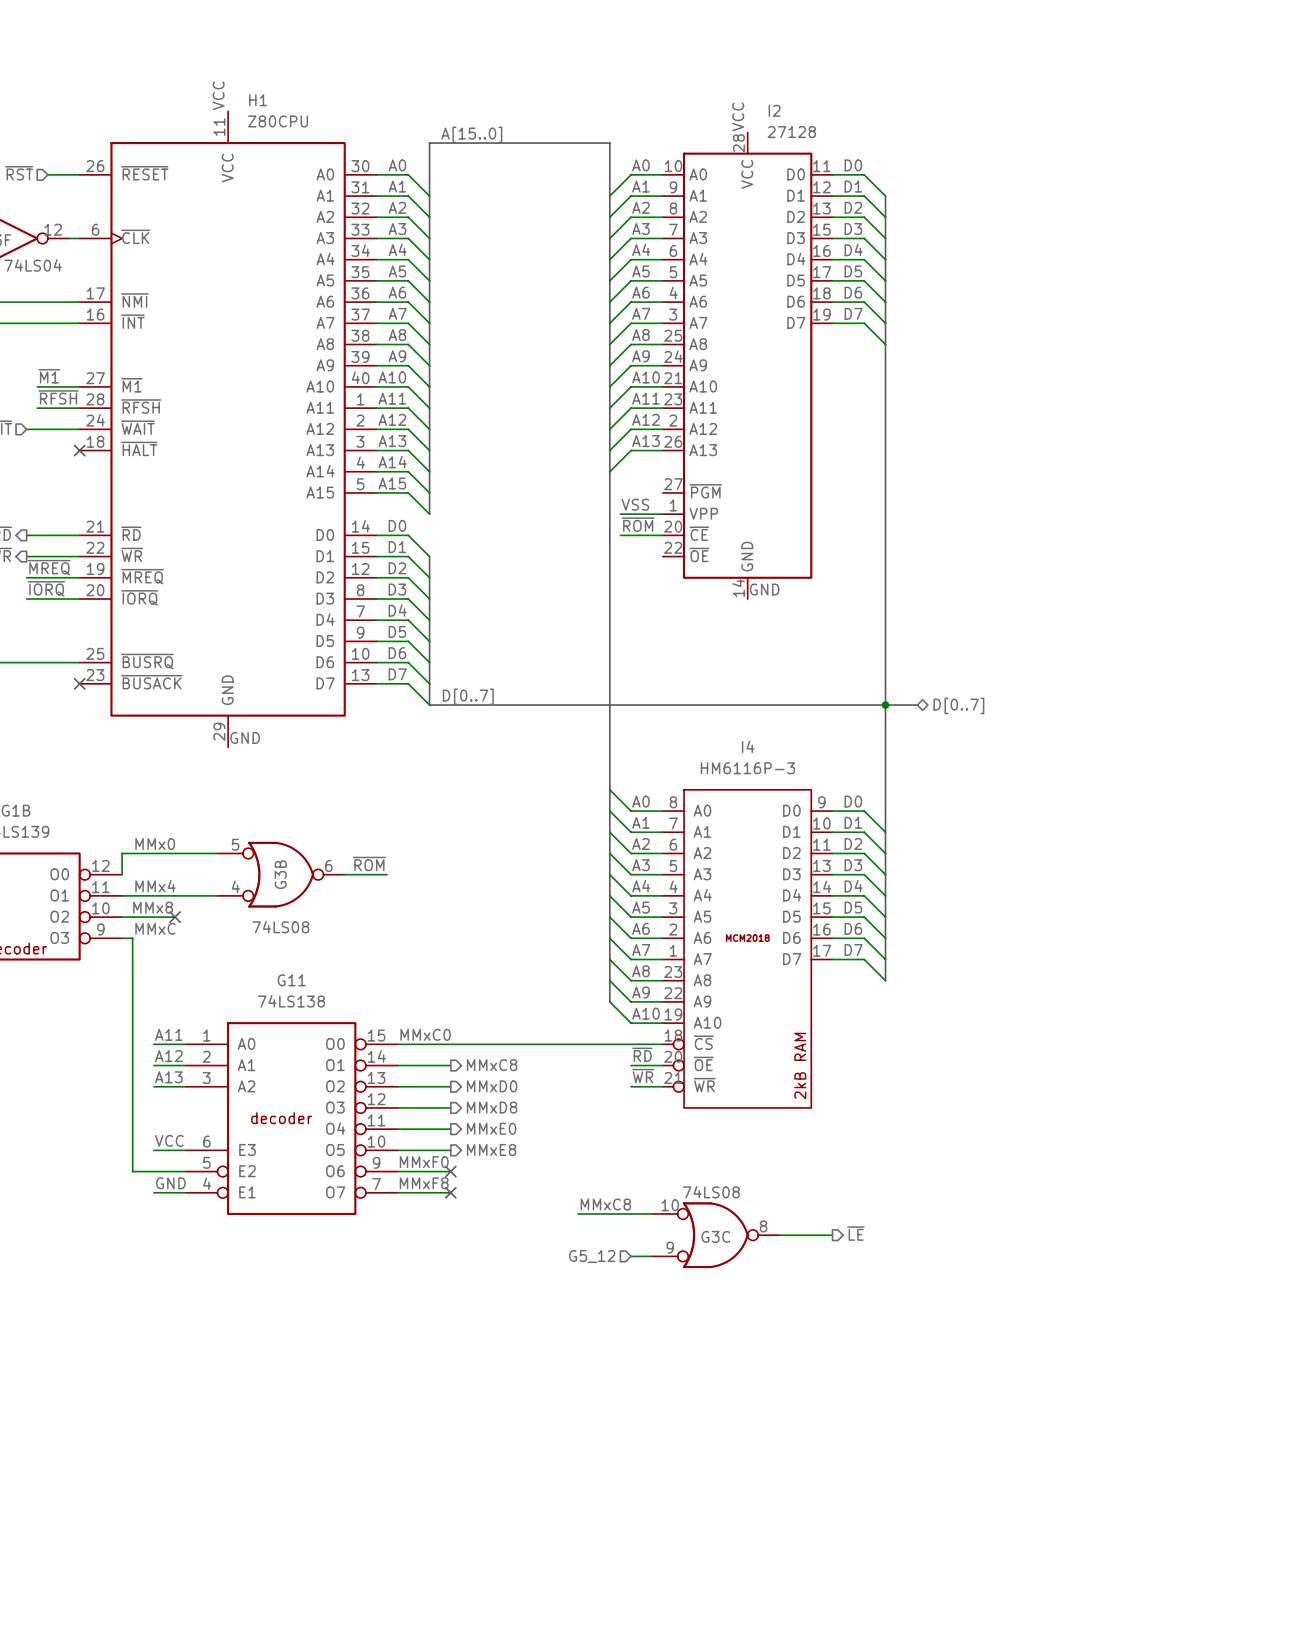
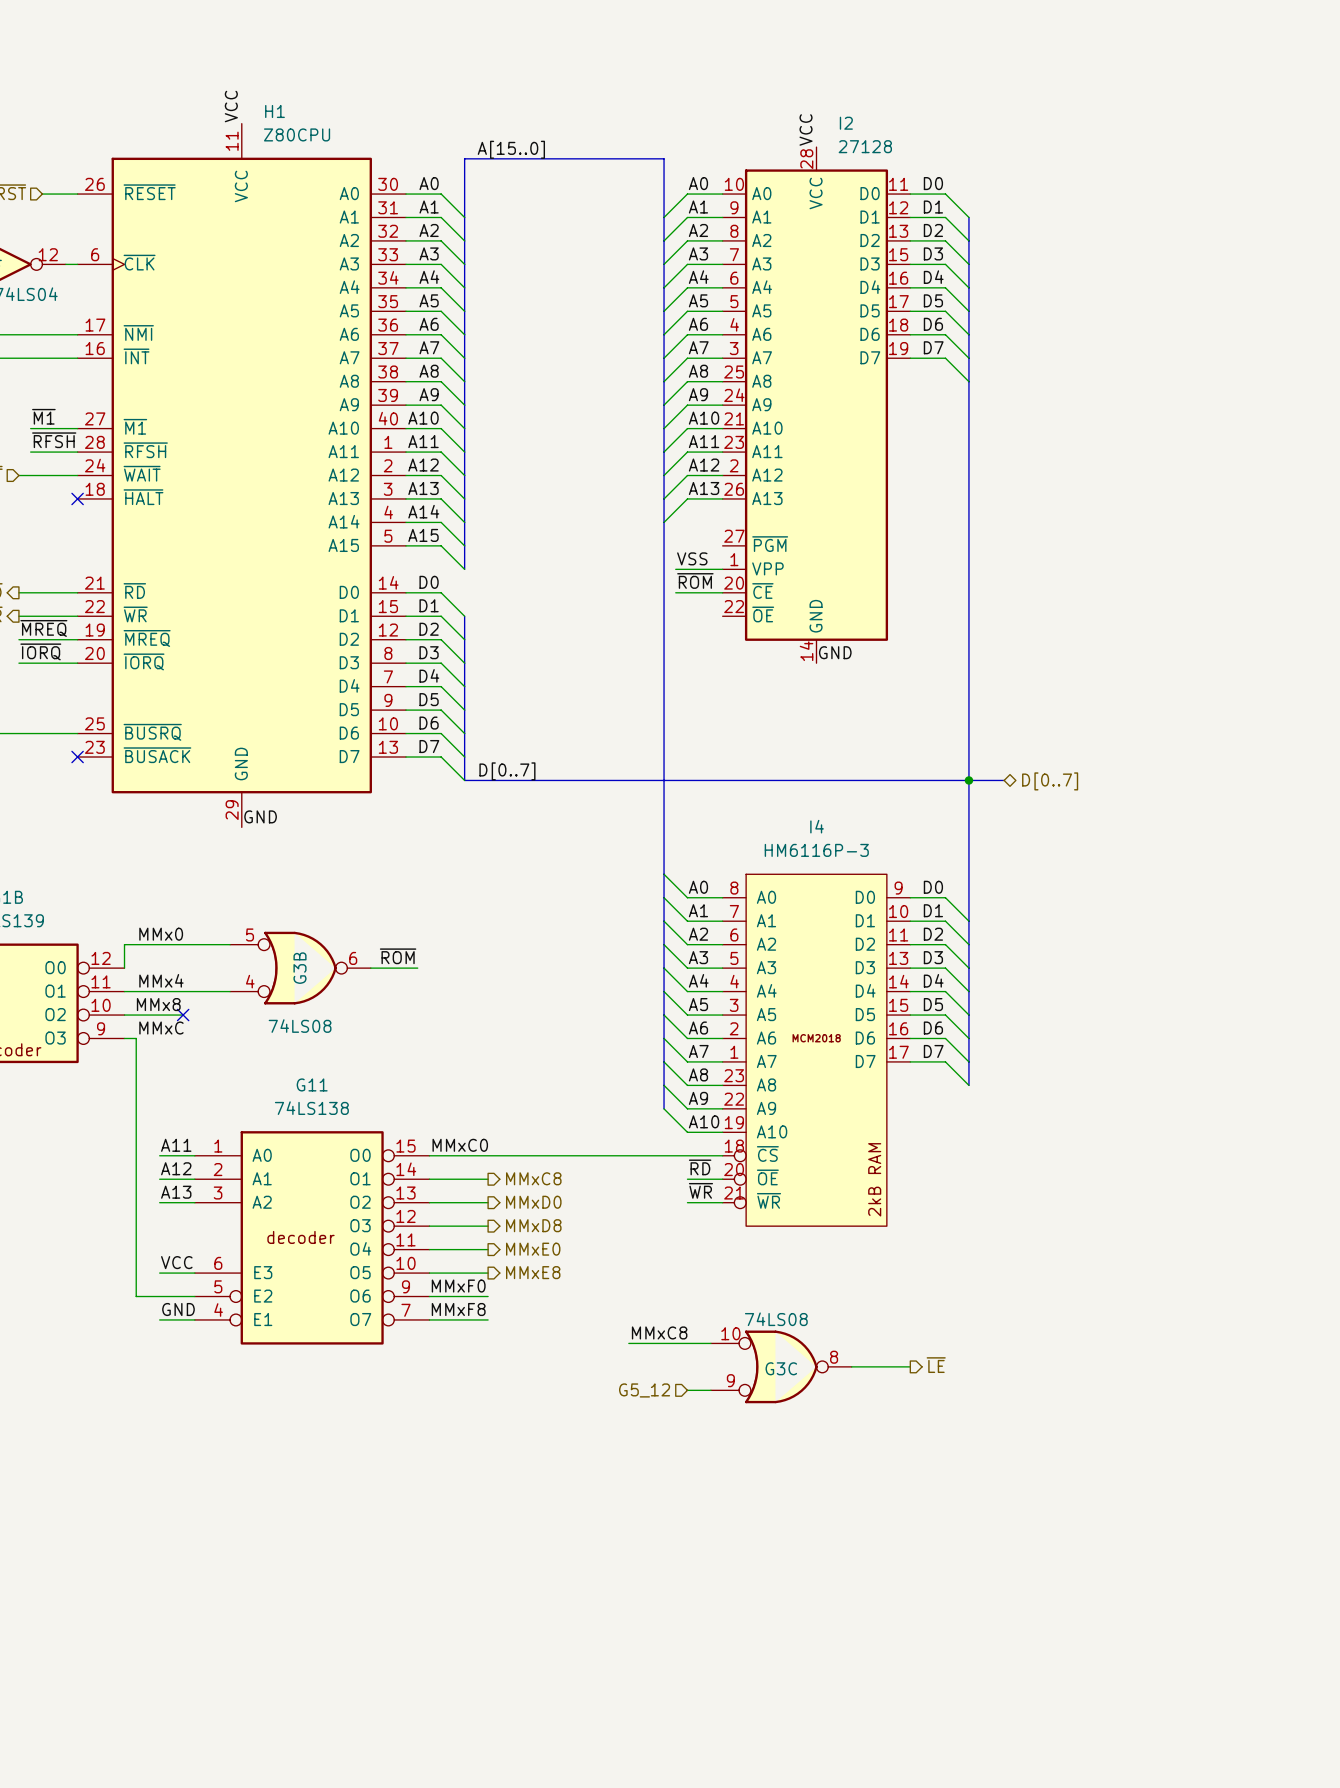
no-connect mark: (450, 1171) -> none
no-connect mark: (450, 1192) -> none

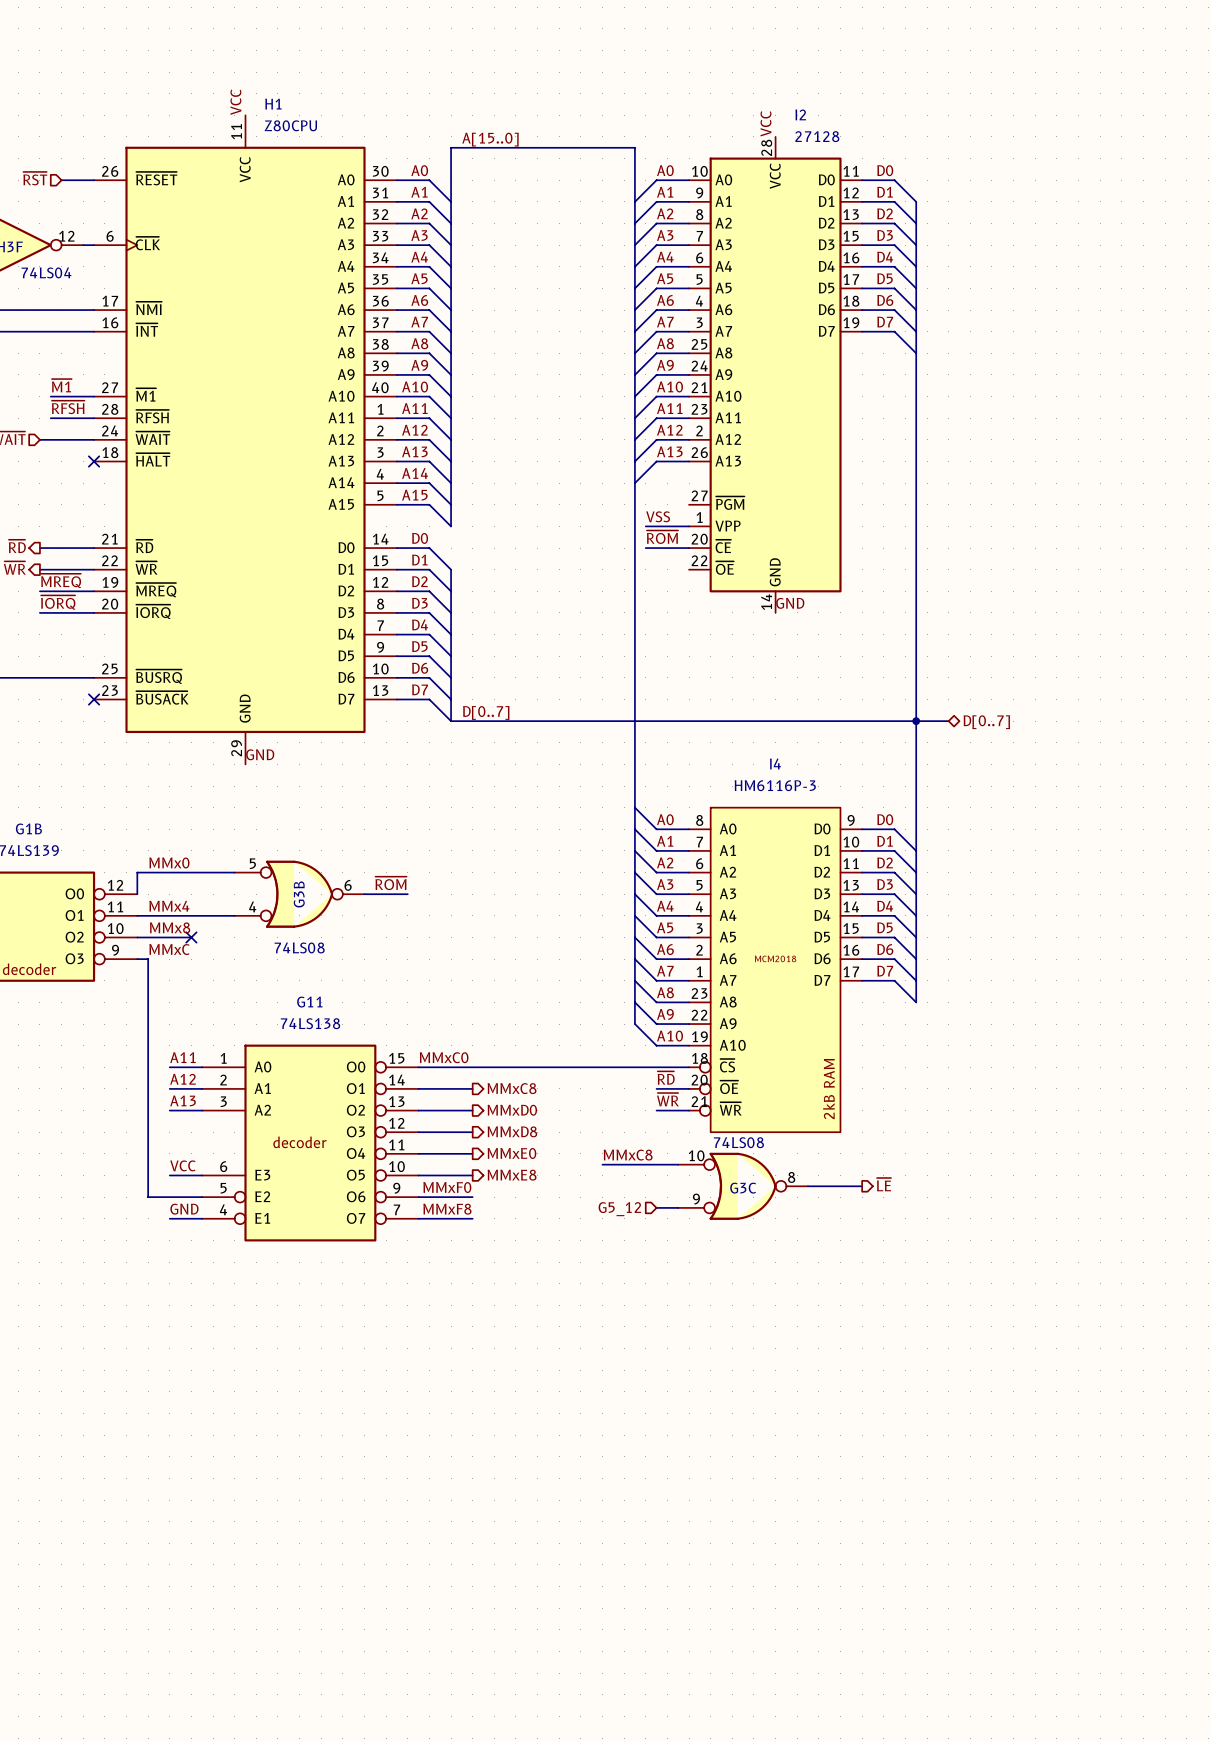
label position: MMxC8 (659, 1332) -> MMxC8 (628, 1155)
wire: (628, 1343) (710, 1343) -> (602, 1164) (678, 1164)
hierarchical label position: ~{LE} (936, 1365) -> ~{LE} (884, 1184)
G3C position: (781, 1366) -> (743, 1186)
wire: (851, 1366) (910, 1366) -> (808, 1186) (862, 1186)
hierarchical label position: G5_12 (644, 1390) -> G5_12 (619, 1209)
wire: (687, 1390) (710, 1390) -> (656, 1207) (678, 1207)

